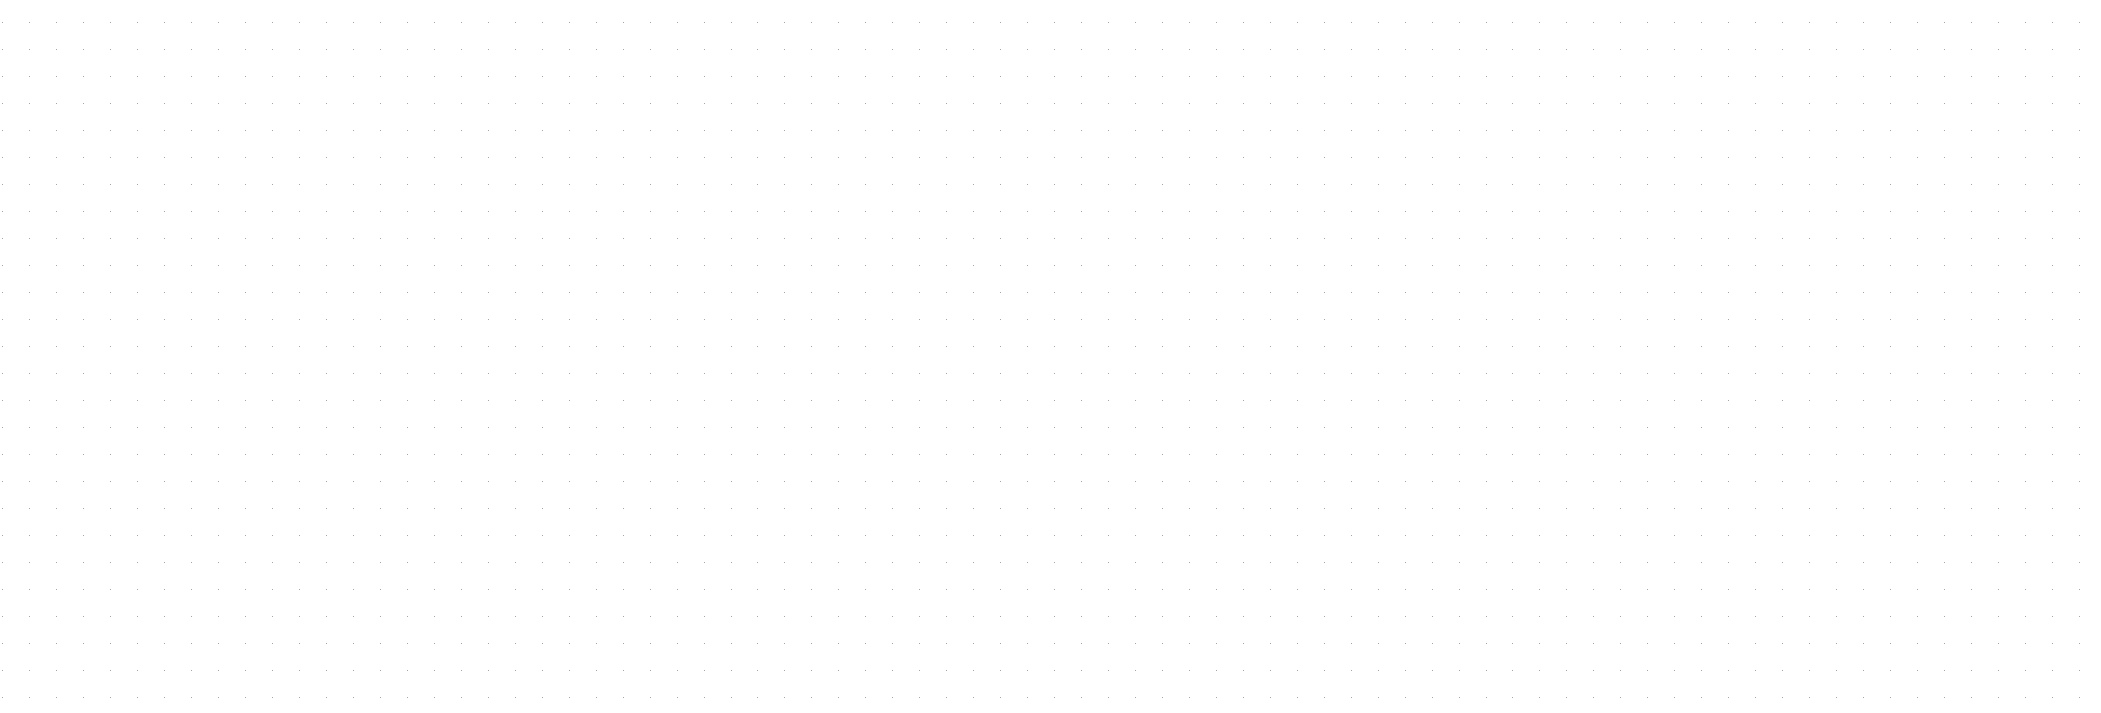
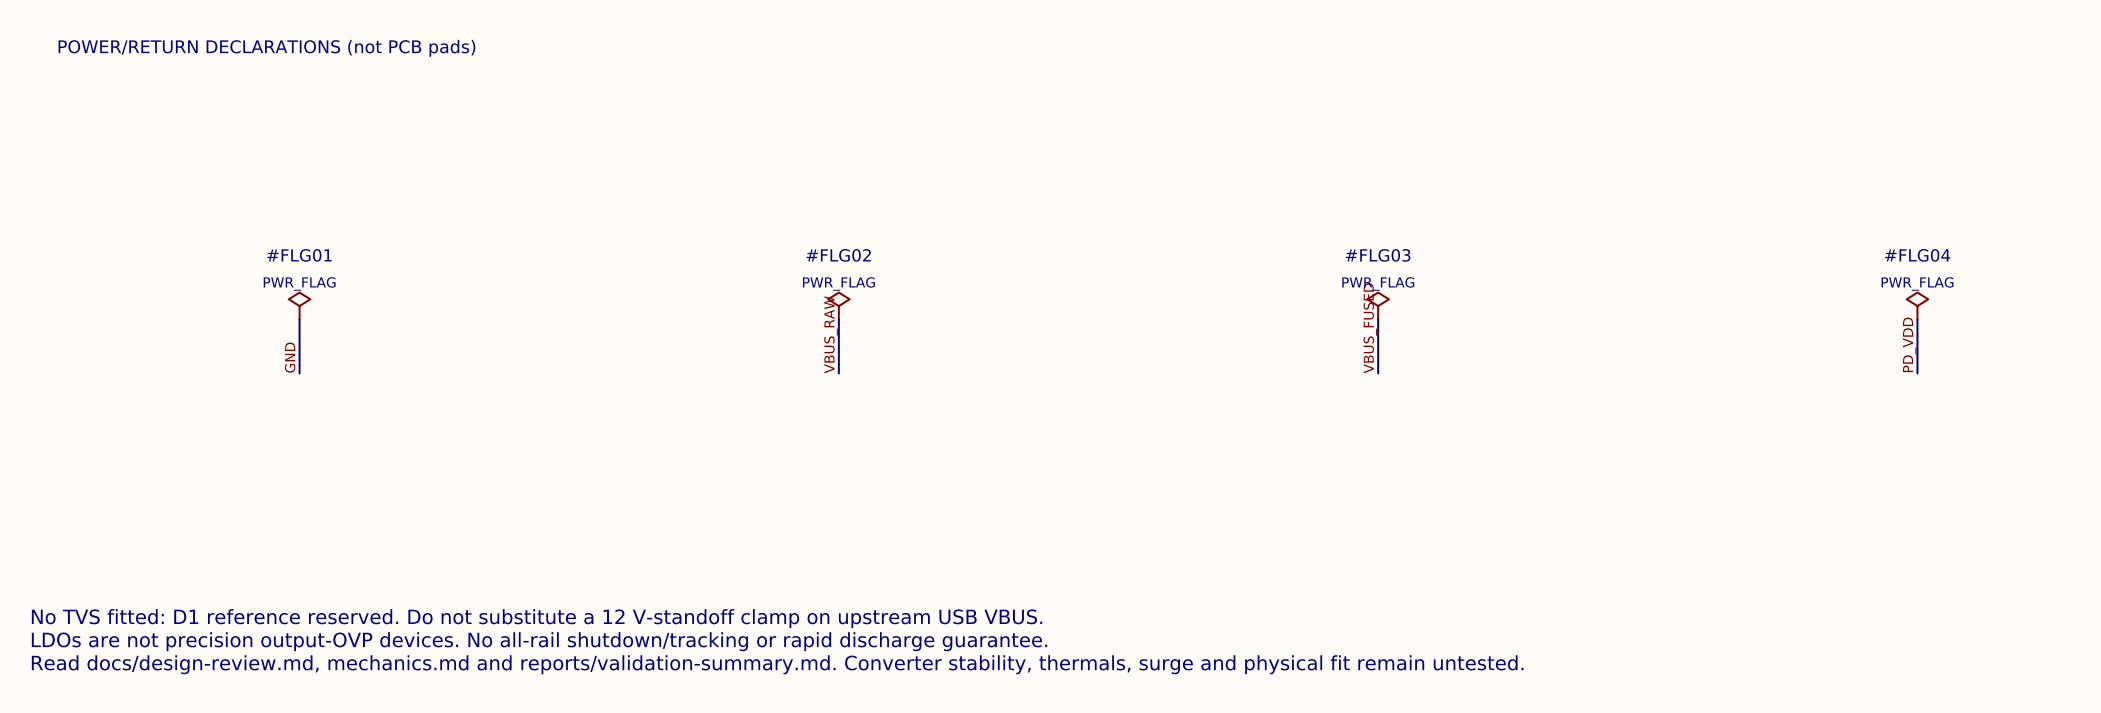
text: none -> POWER/RETURN DECLARATIONS (not PCB pads) (266, 48)
#FLG01: none -> PWR_FLAG (299, 306)
#FLG02: none -> PWR_FLAG (838, 306)
#FLG03: none -> PWR_FLAG (1378, 306)
#FLG04: none -> PWR_FLAG (1917, 306)
wire: none -> (299, 319) (299, 373)
wire: none -> (838, 319) (838, 373)
wire: none -> (1378, 319) (1378, 373)
wire: none -> (1917, 319) (1917, 373)
label: none -> VBUS_FUSED (1370, 328)
label: none -> VBUS_RAW (830, 334)
label: none -> PD_VDD (1909, 344)
label: none -> GND (290, 357)
text: none -> No TVS fitted: D1 reference reserved. Do not substitute a 12 V-standoff clamp on upstream USB VBUS. (537, 618)
text: none -> LDOs are not precision output-OVP devices. No all-rail shutdown/tracking or rapid discharge guarantee. (539, 641)
text: none -> Read docs/design-review.md, mechanics.md and reports/validation-summary.md. Converter stability, thermals, surge and physical fit remain untested. (777, 664)

